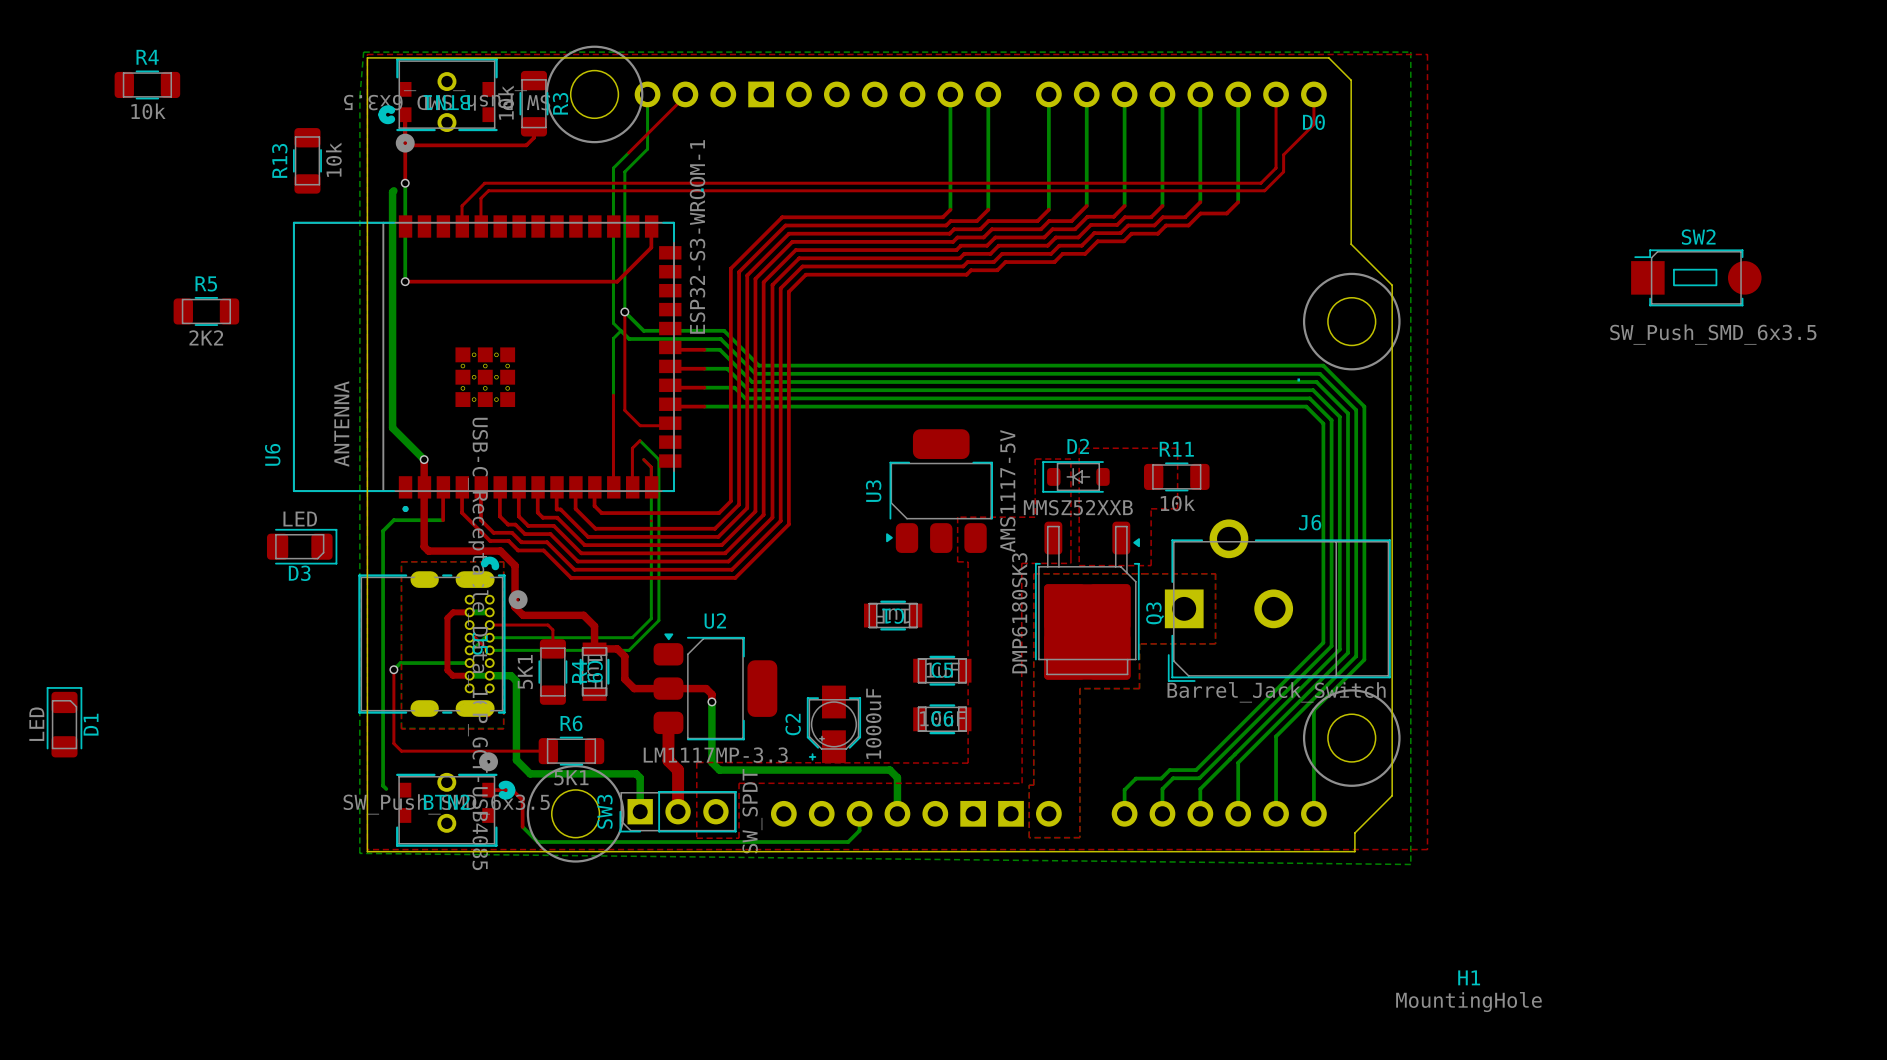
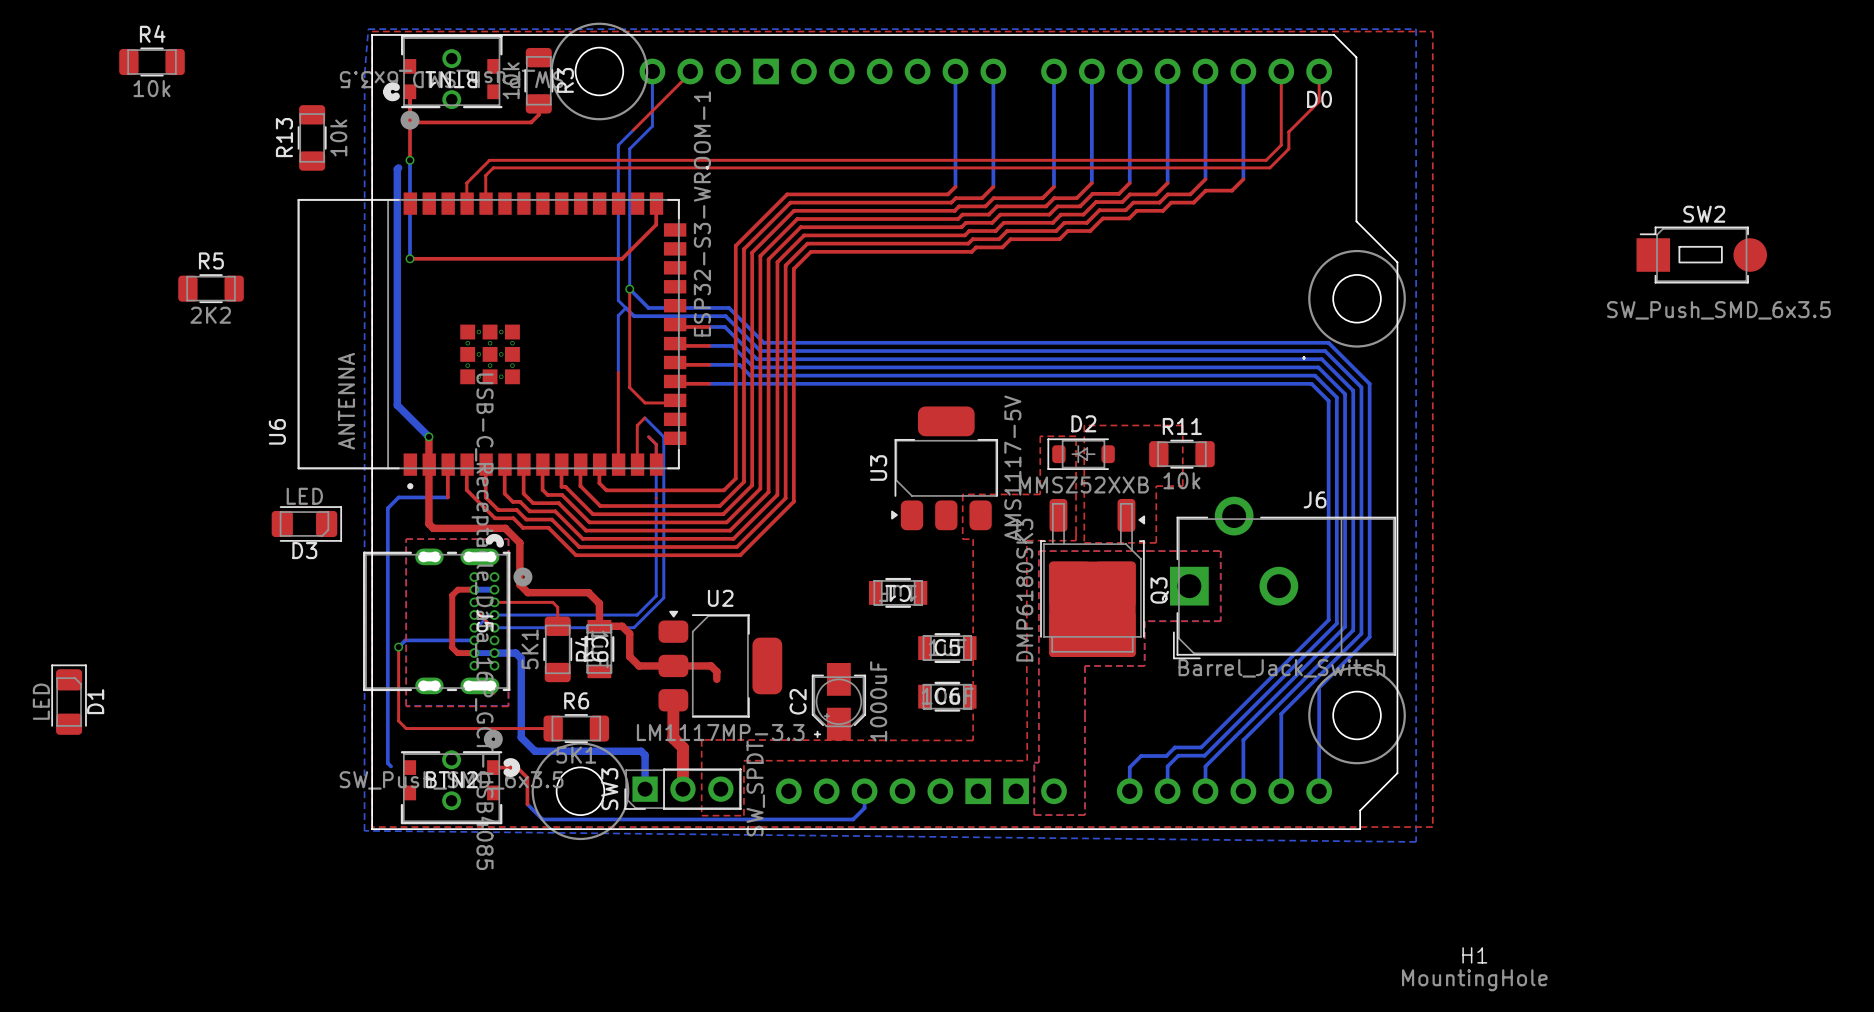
bottom track: (711, 701) (711, 762) (719, 770) (889, 770) (897, 777) (897, 813) -> none
via: (711, 701) -> none

